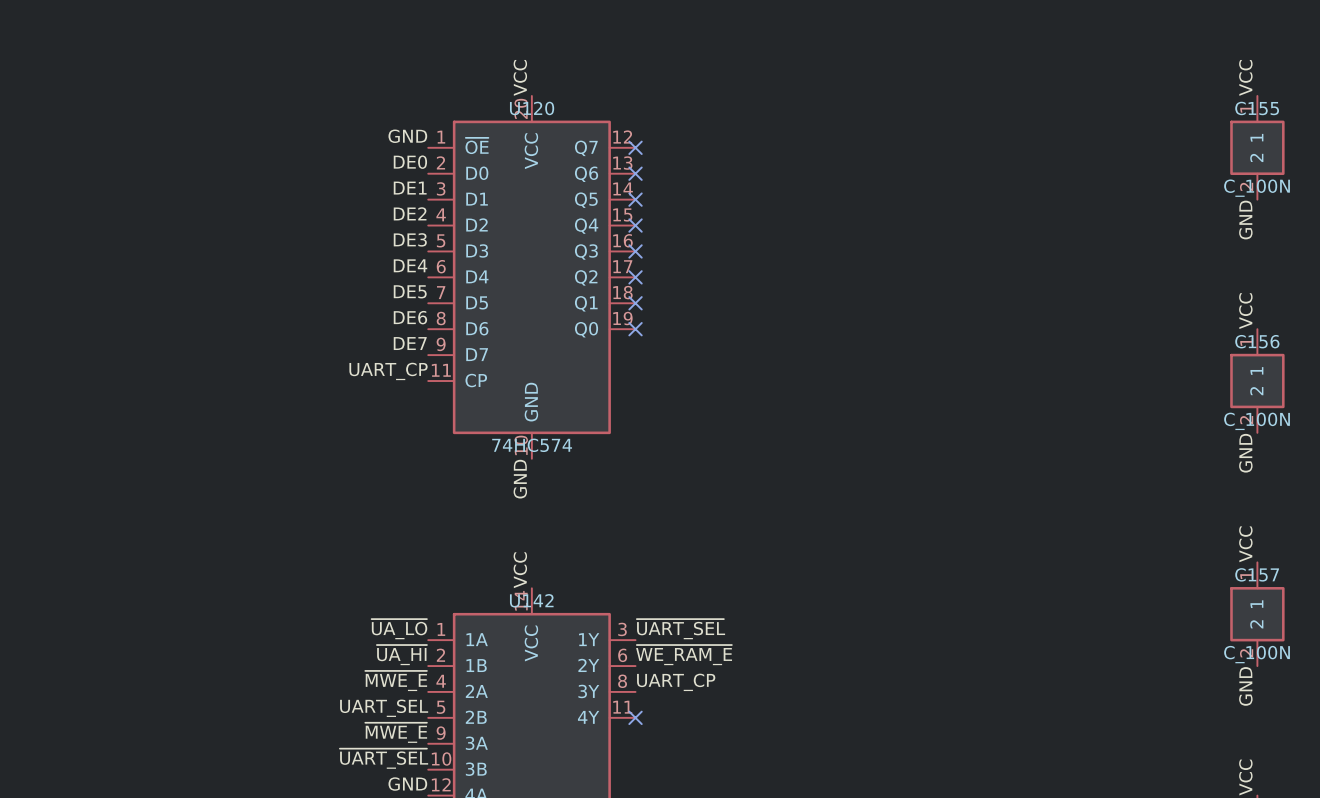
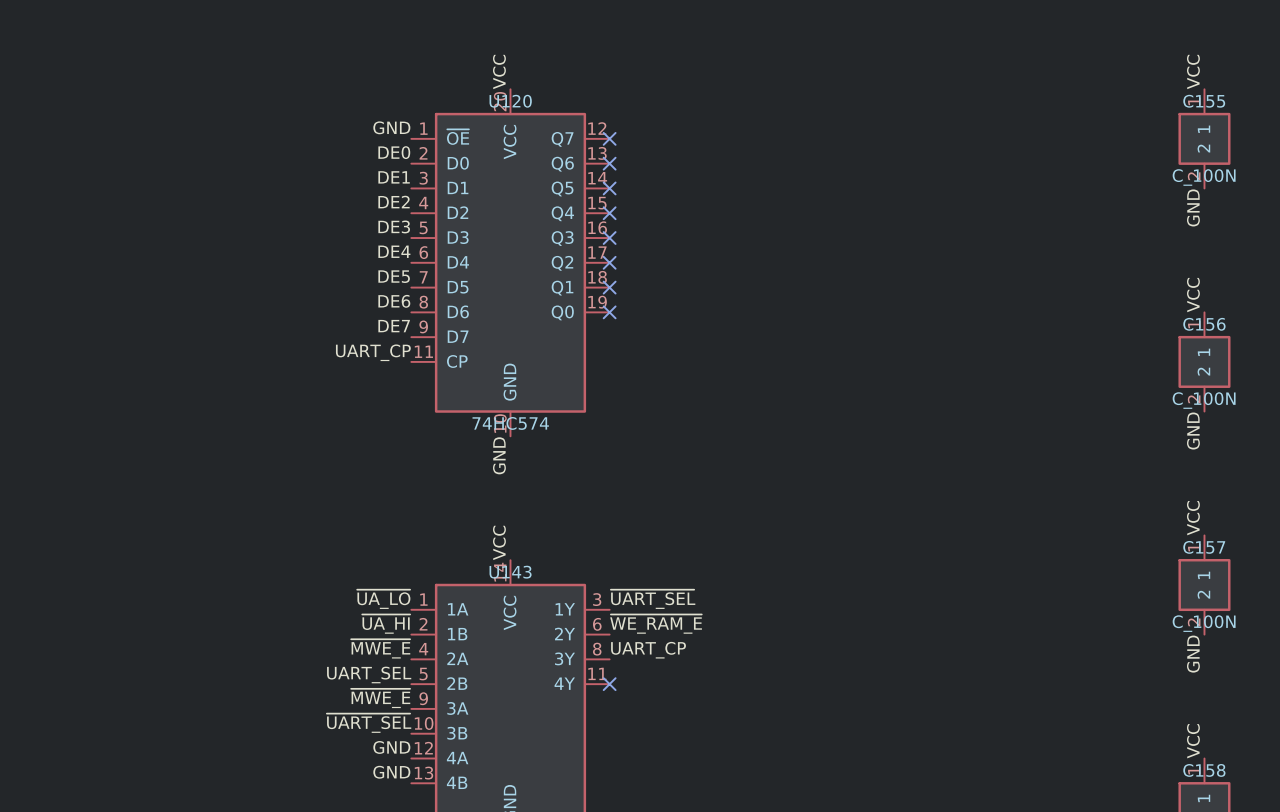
U142 name: U142 (531, 600) -> U143 (510, 572)

